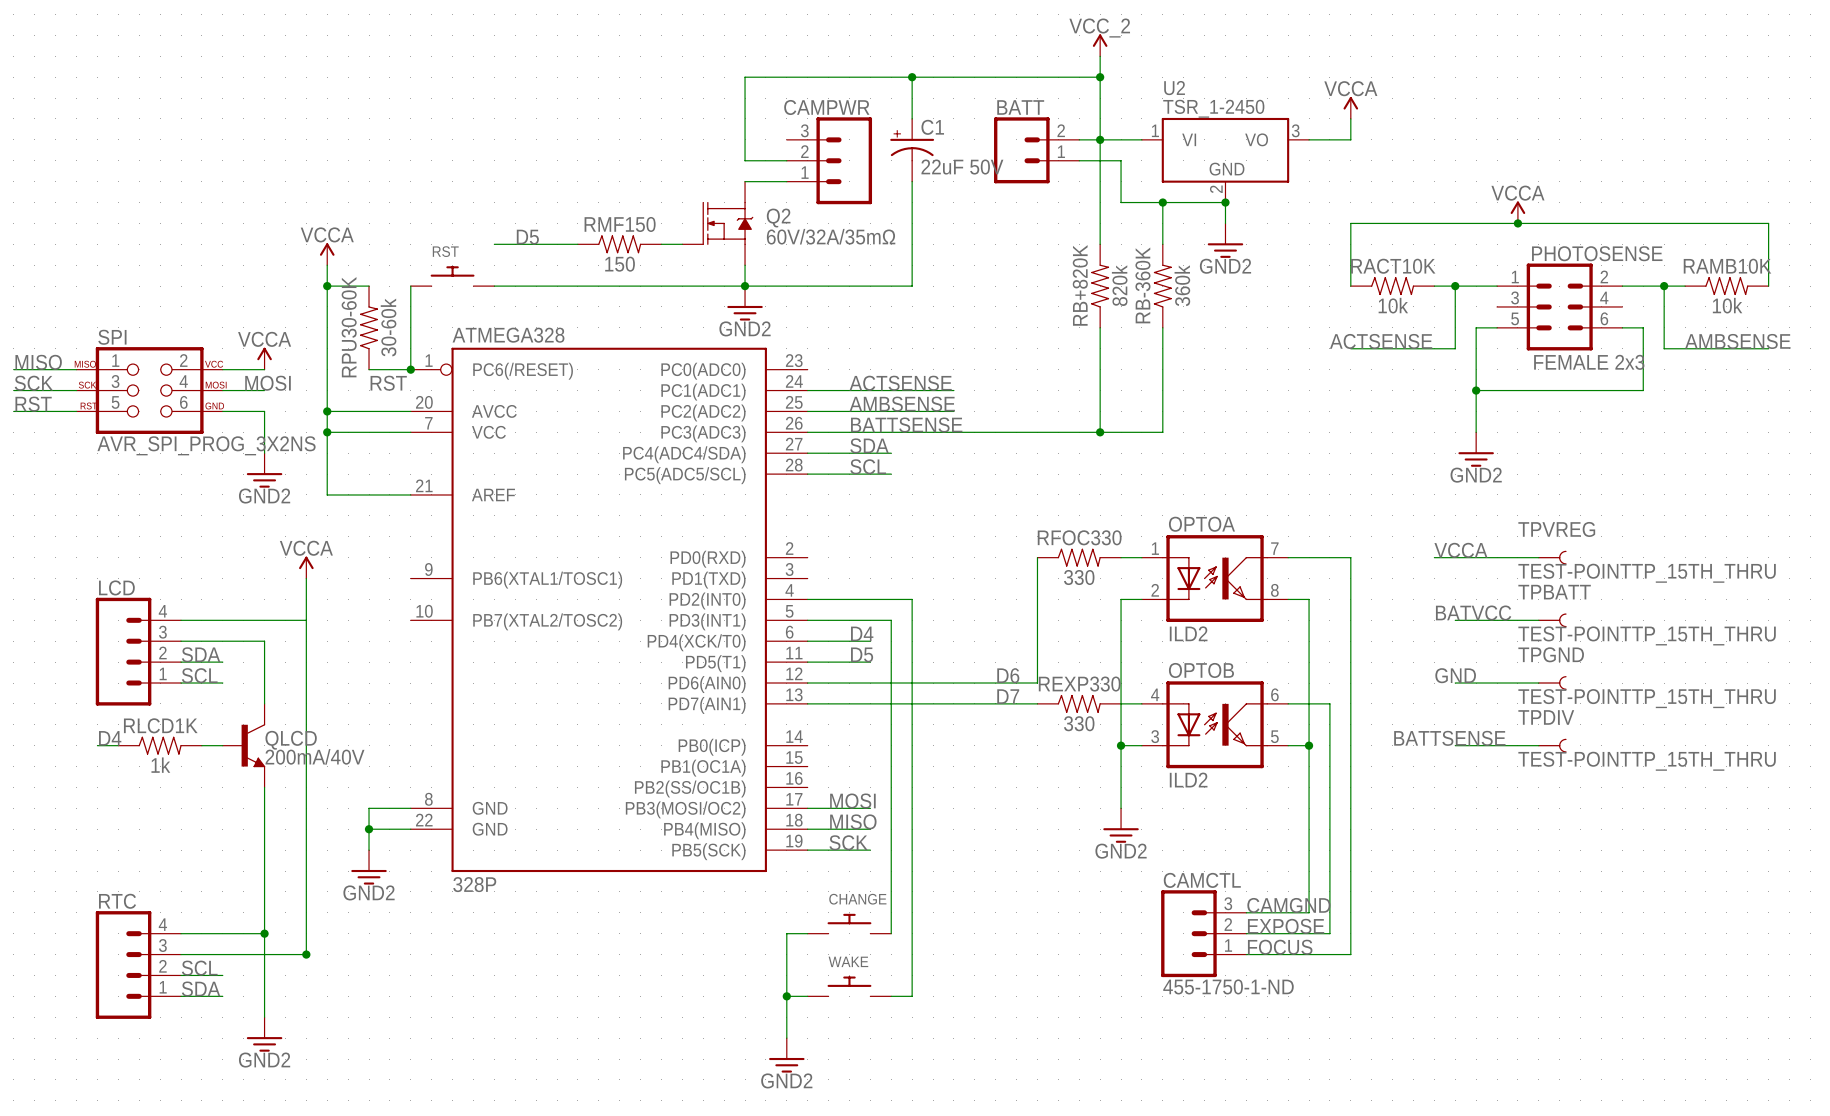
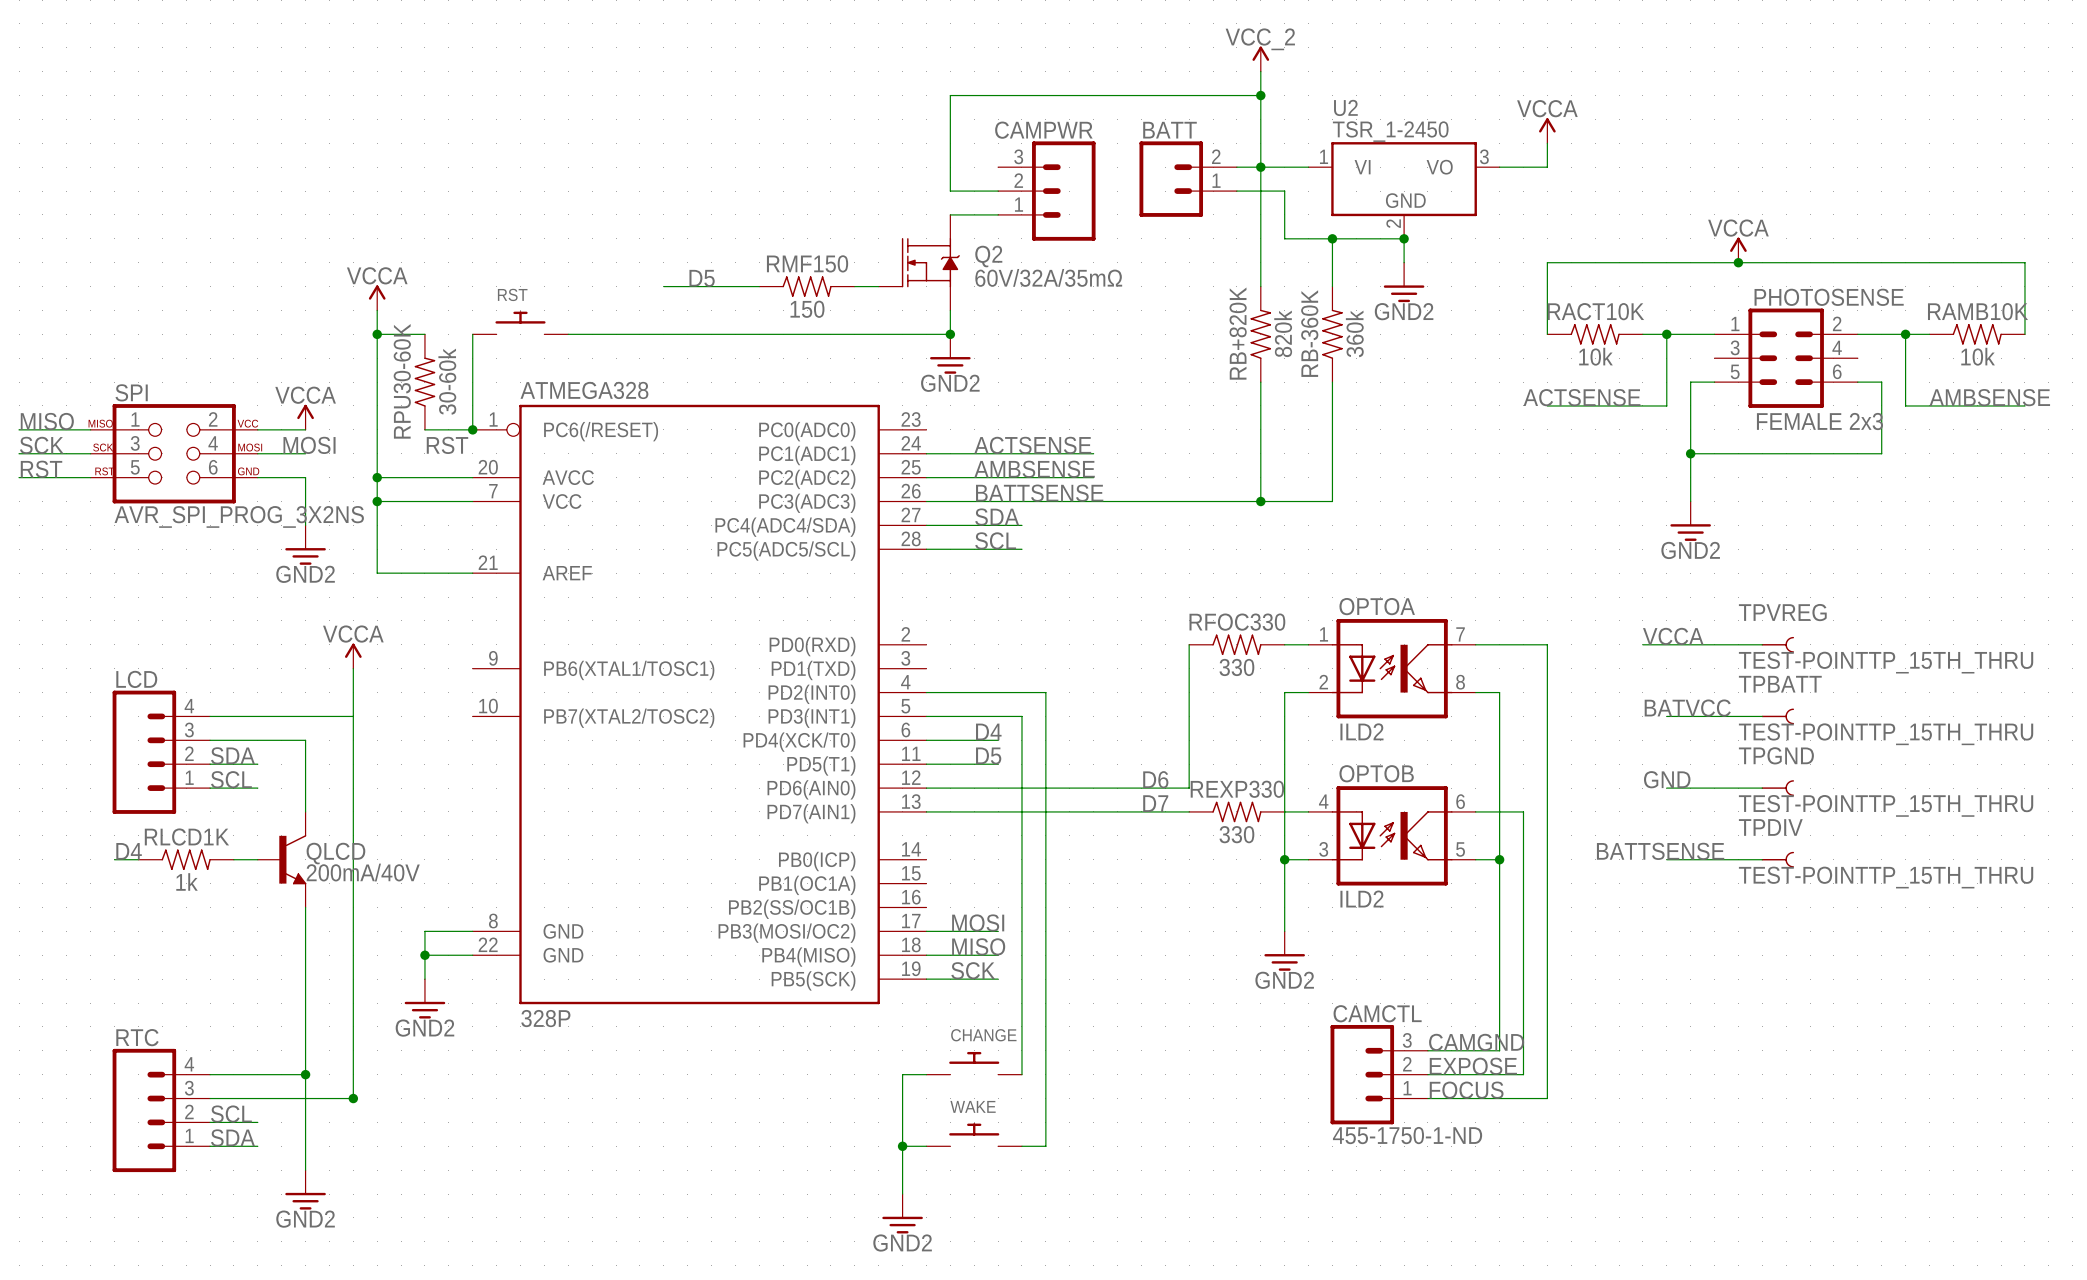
wire: (828, 77) (745, 77) (745, 160) (786, 160) -> (950, 95) (950, 191) (998, 191)
wire: (912, 77) (912, 118) -> none
junction: (912, 77) -> none
C1: 22uF 50V (912, 150) -> none
CAMPWR position: (829, 160) -> (1046, 191)
wire: (745, 181) (786, 181) -> (950, 214) (998, 214)
wire: (912, 181) (912, 286) (828, 286) -> (950, 310) (950, 334)
Q2 position: (717, 223) -> (919, 262)
label position: D5 (527, 237) -> D5 (702, 278)
wire: (494, 244) (577, 244) -> none
RMF150 position: (619, 244) -> (807, 286)
wire: none -> (854, 286) (878, 286)
wire: (745, 265) (745, 286) -> none
junction: (745, 286) -> none
junction: none -> (950, 334)
power symbol position: GND2 (745, 303) -> GND2 (950, 354)

